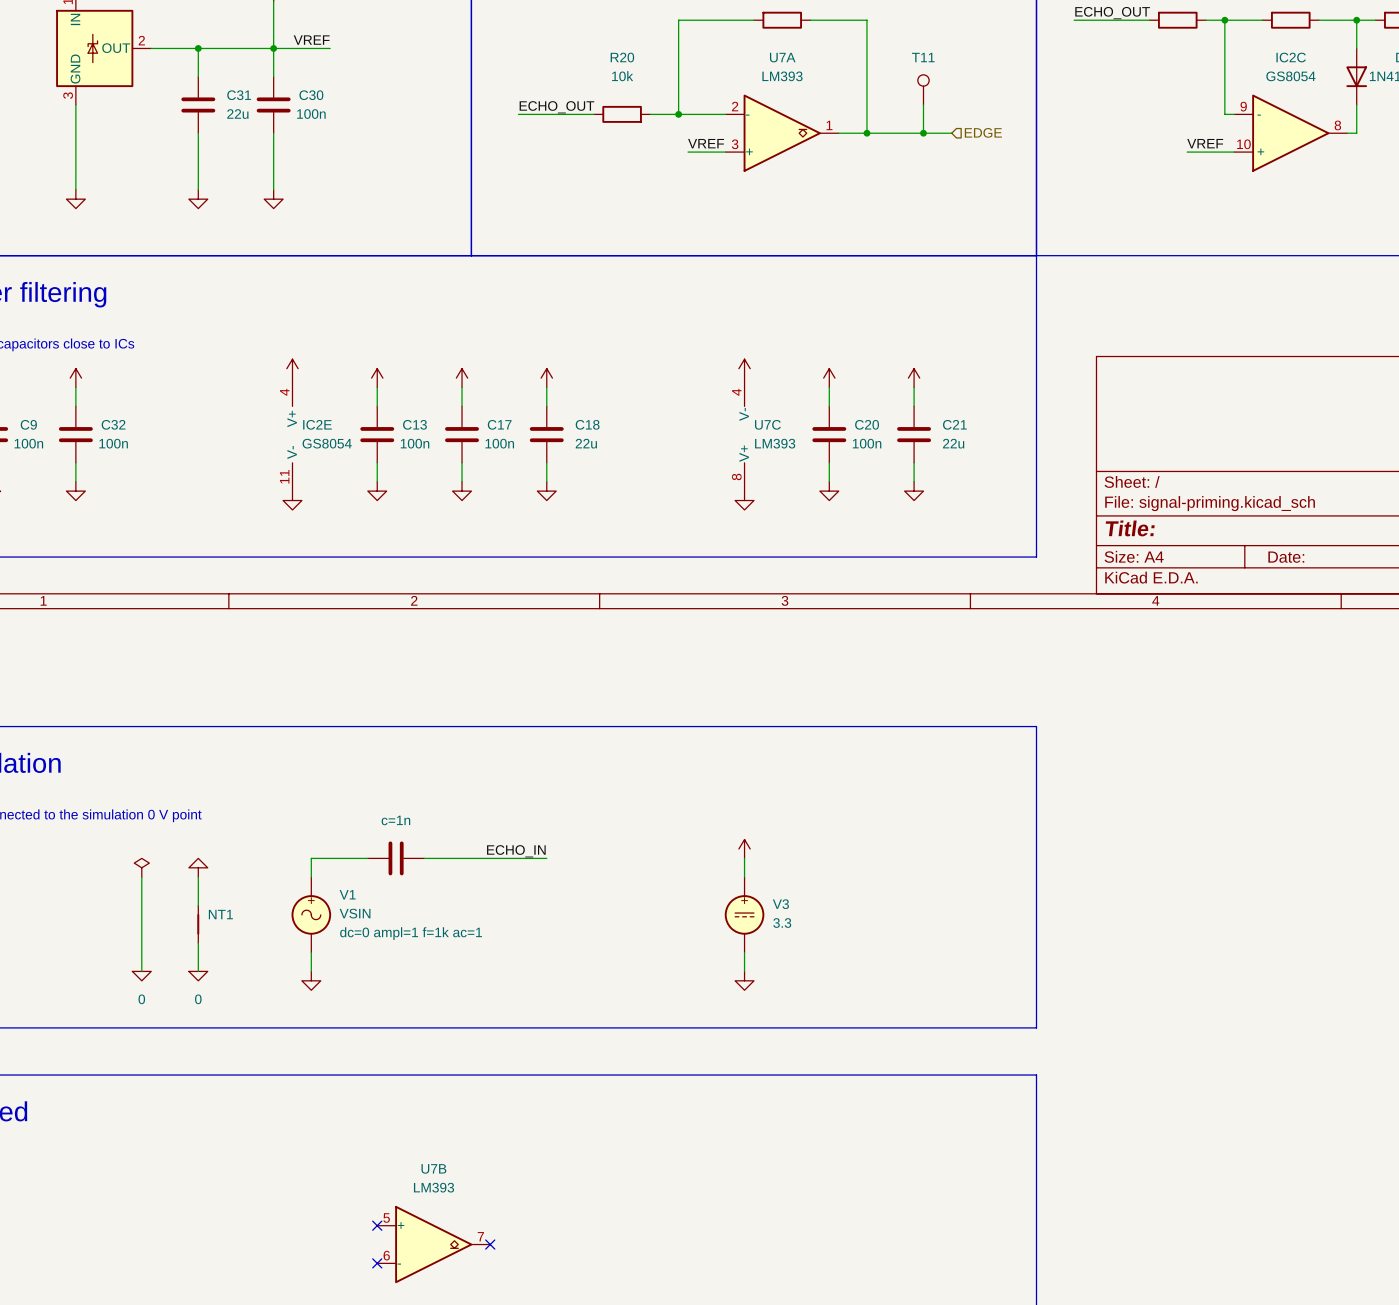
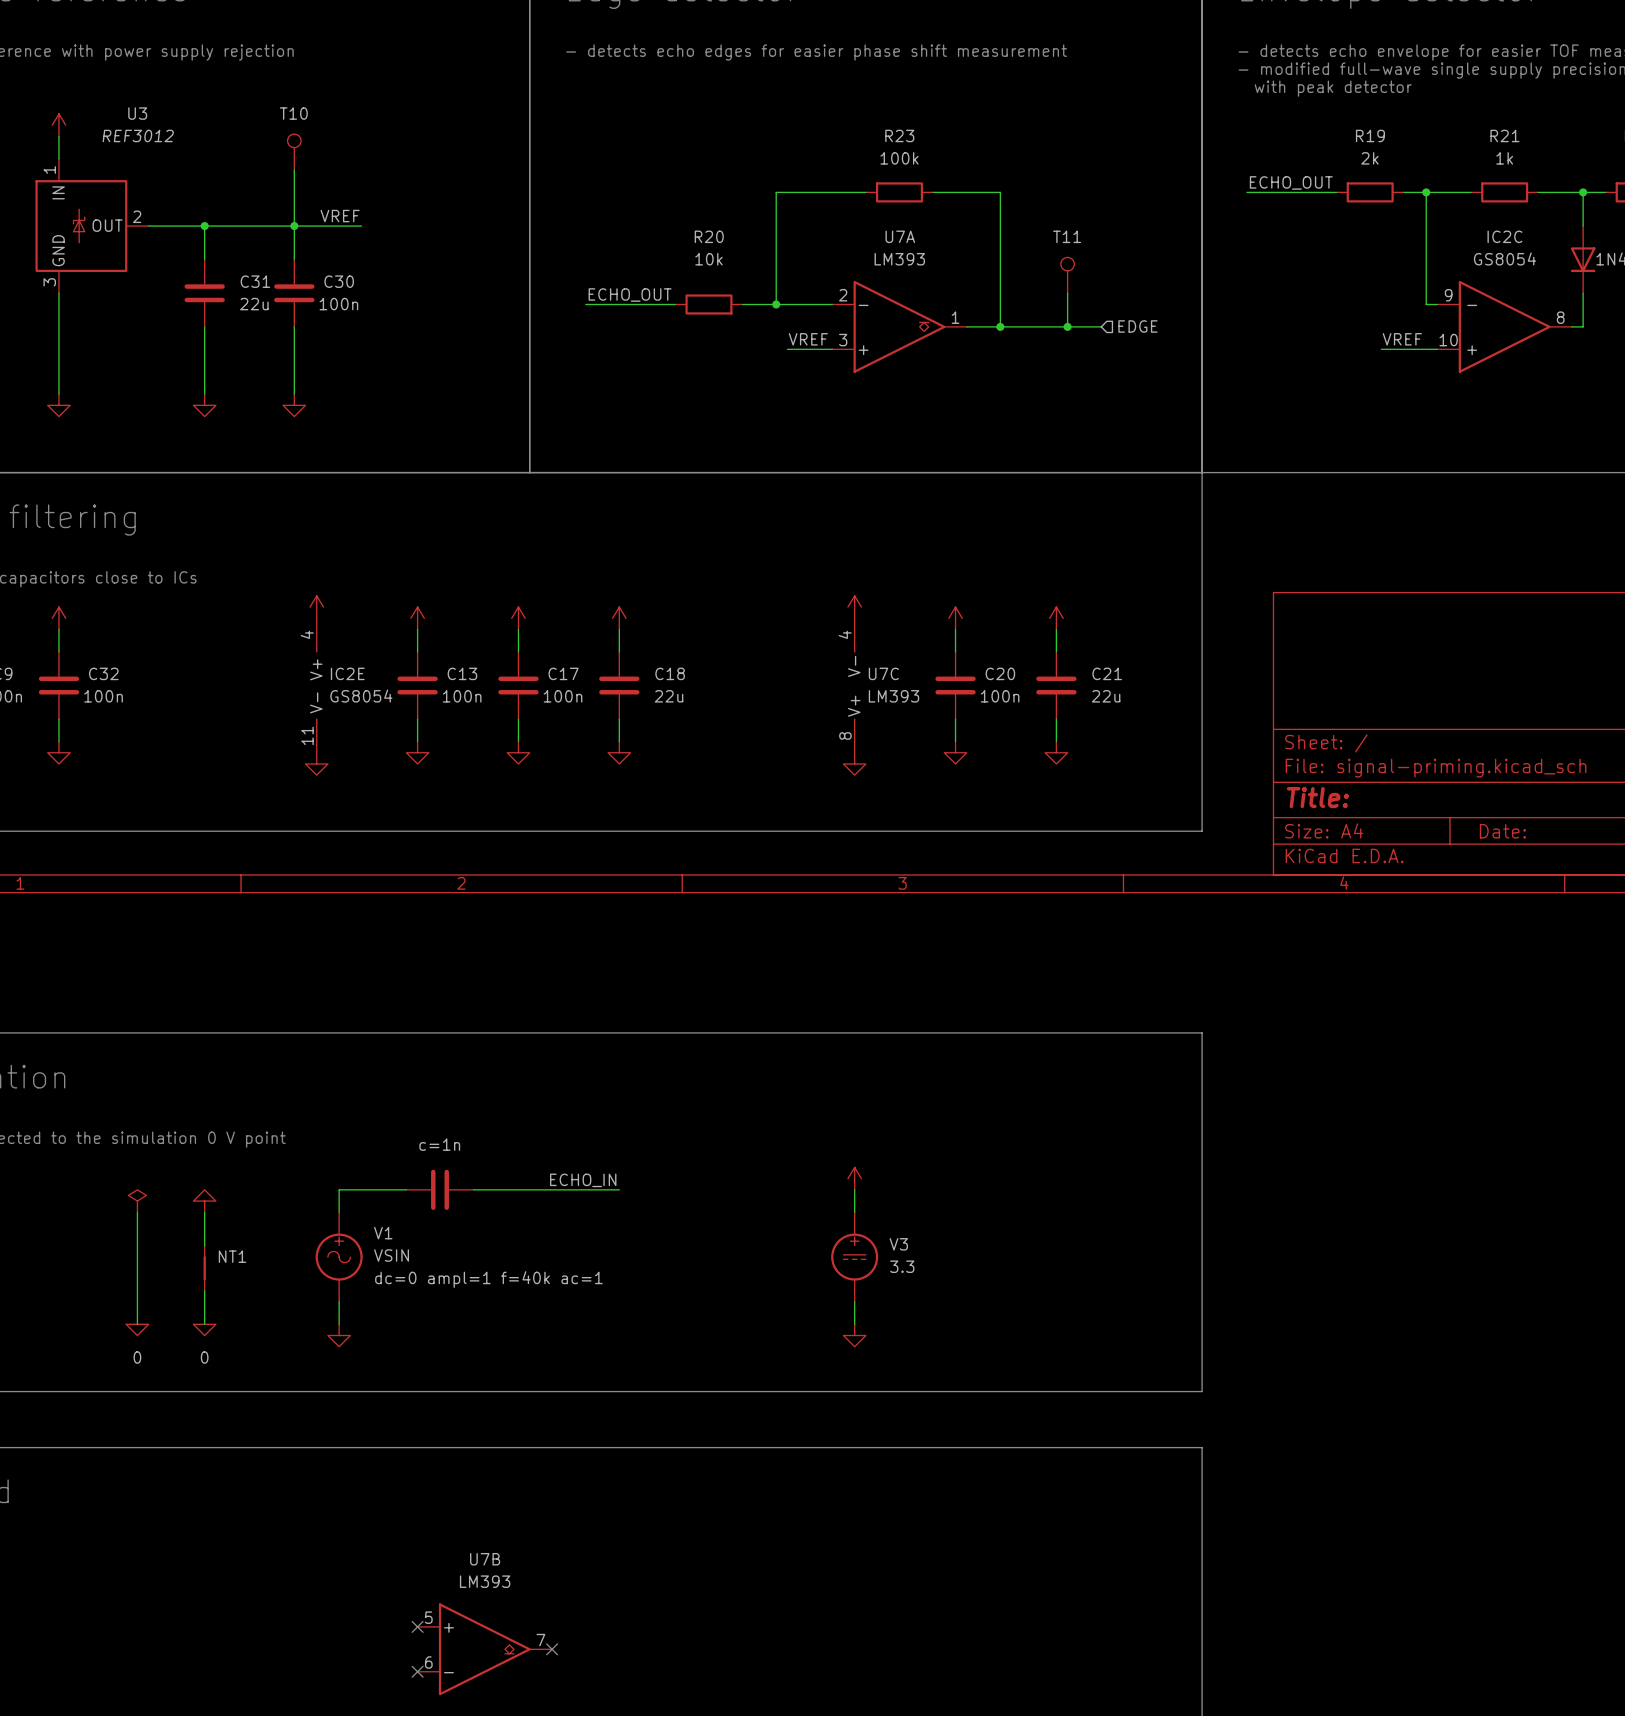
V1 text: dc=0 ampl=1 f=1k ac=1 (411, 933) -> dc=0 ampl=1 f=40k ac=1 (488, 1279)

